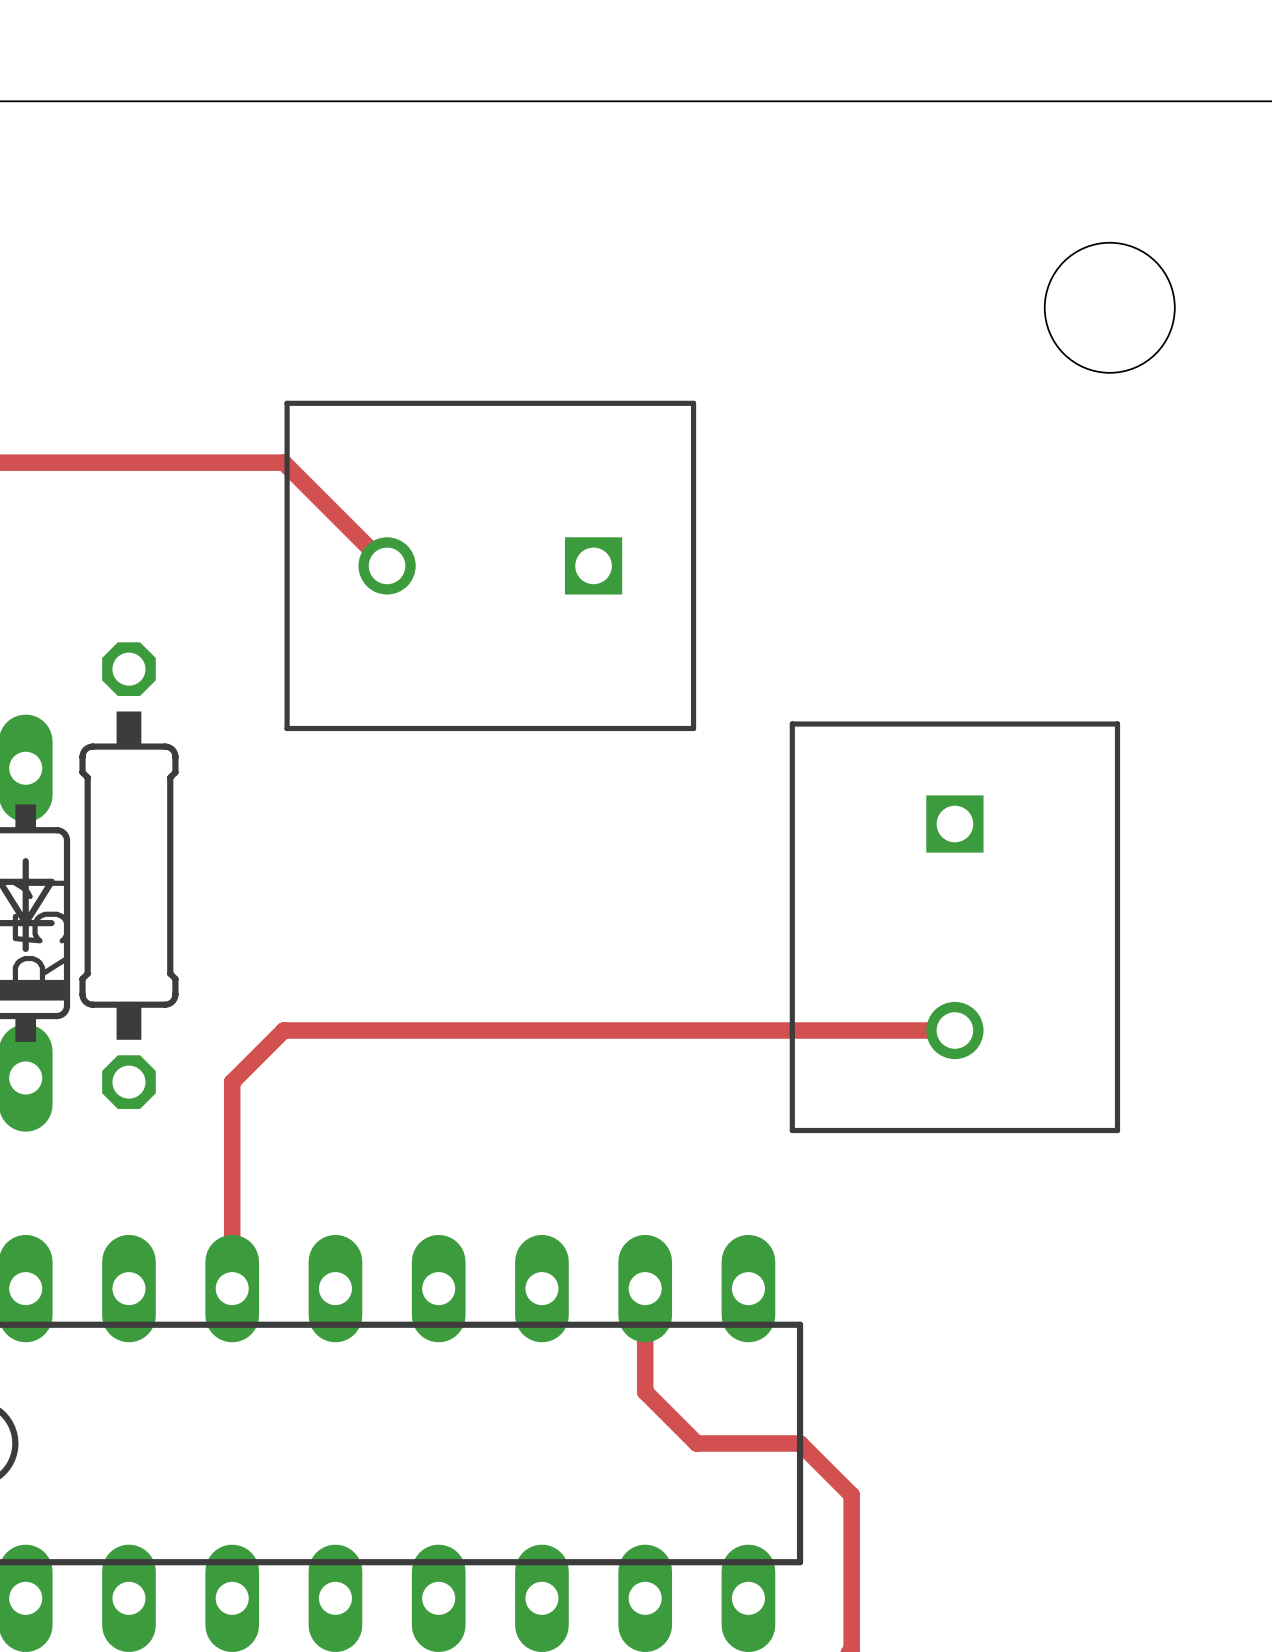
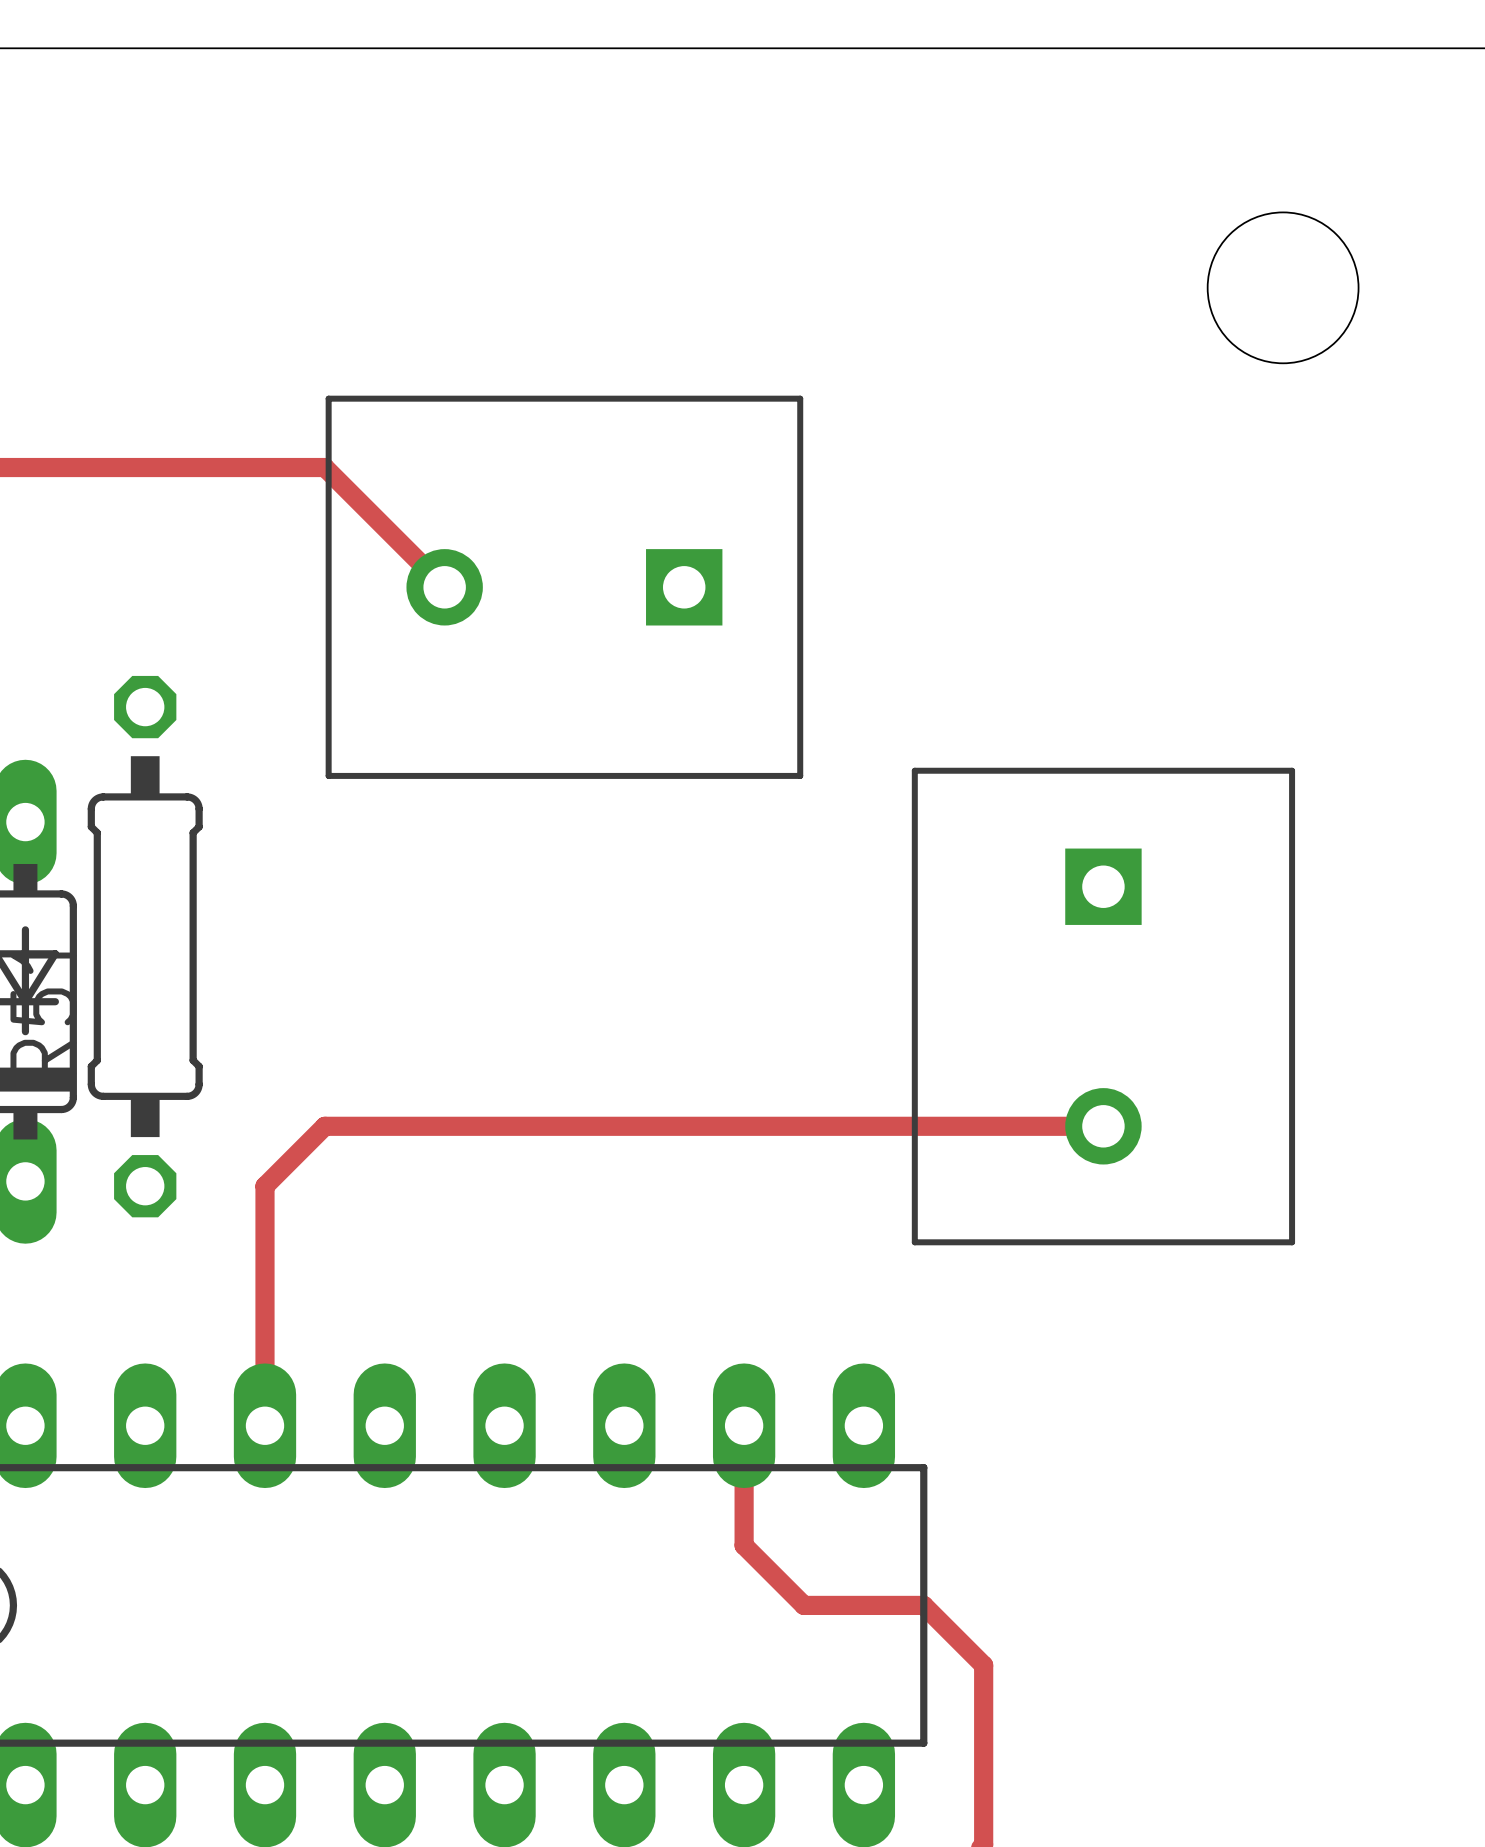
part footprint: [284, 400, 697, 732] -> [325, 395, 804, 779]
part footprint: [789, 721, 1121, 1134] -> [911, 767, 1296, 1246]

